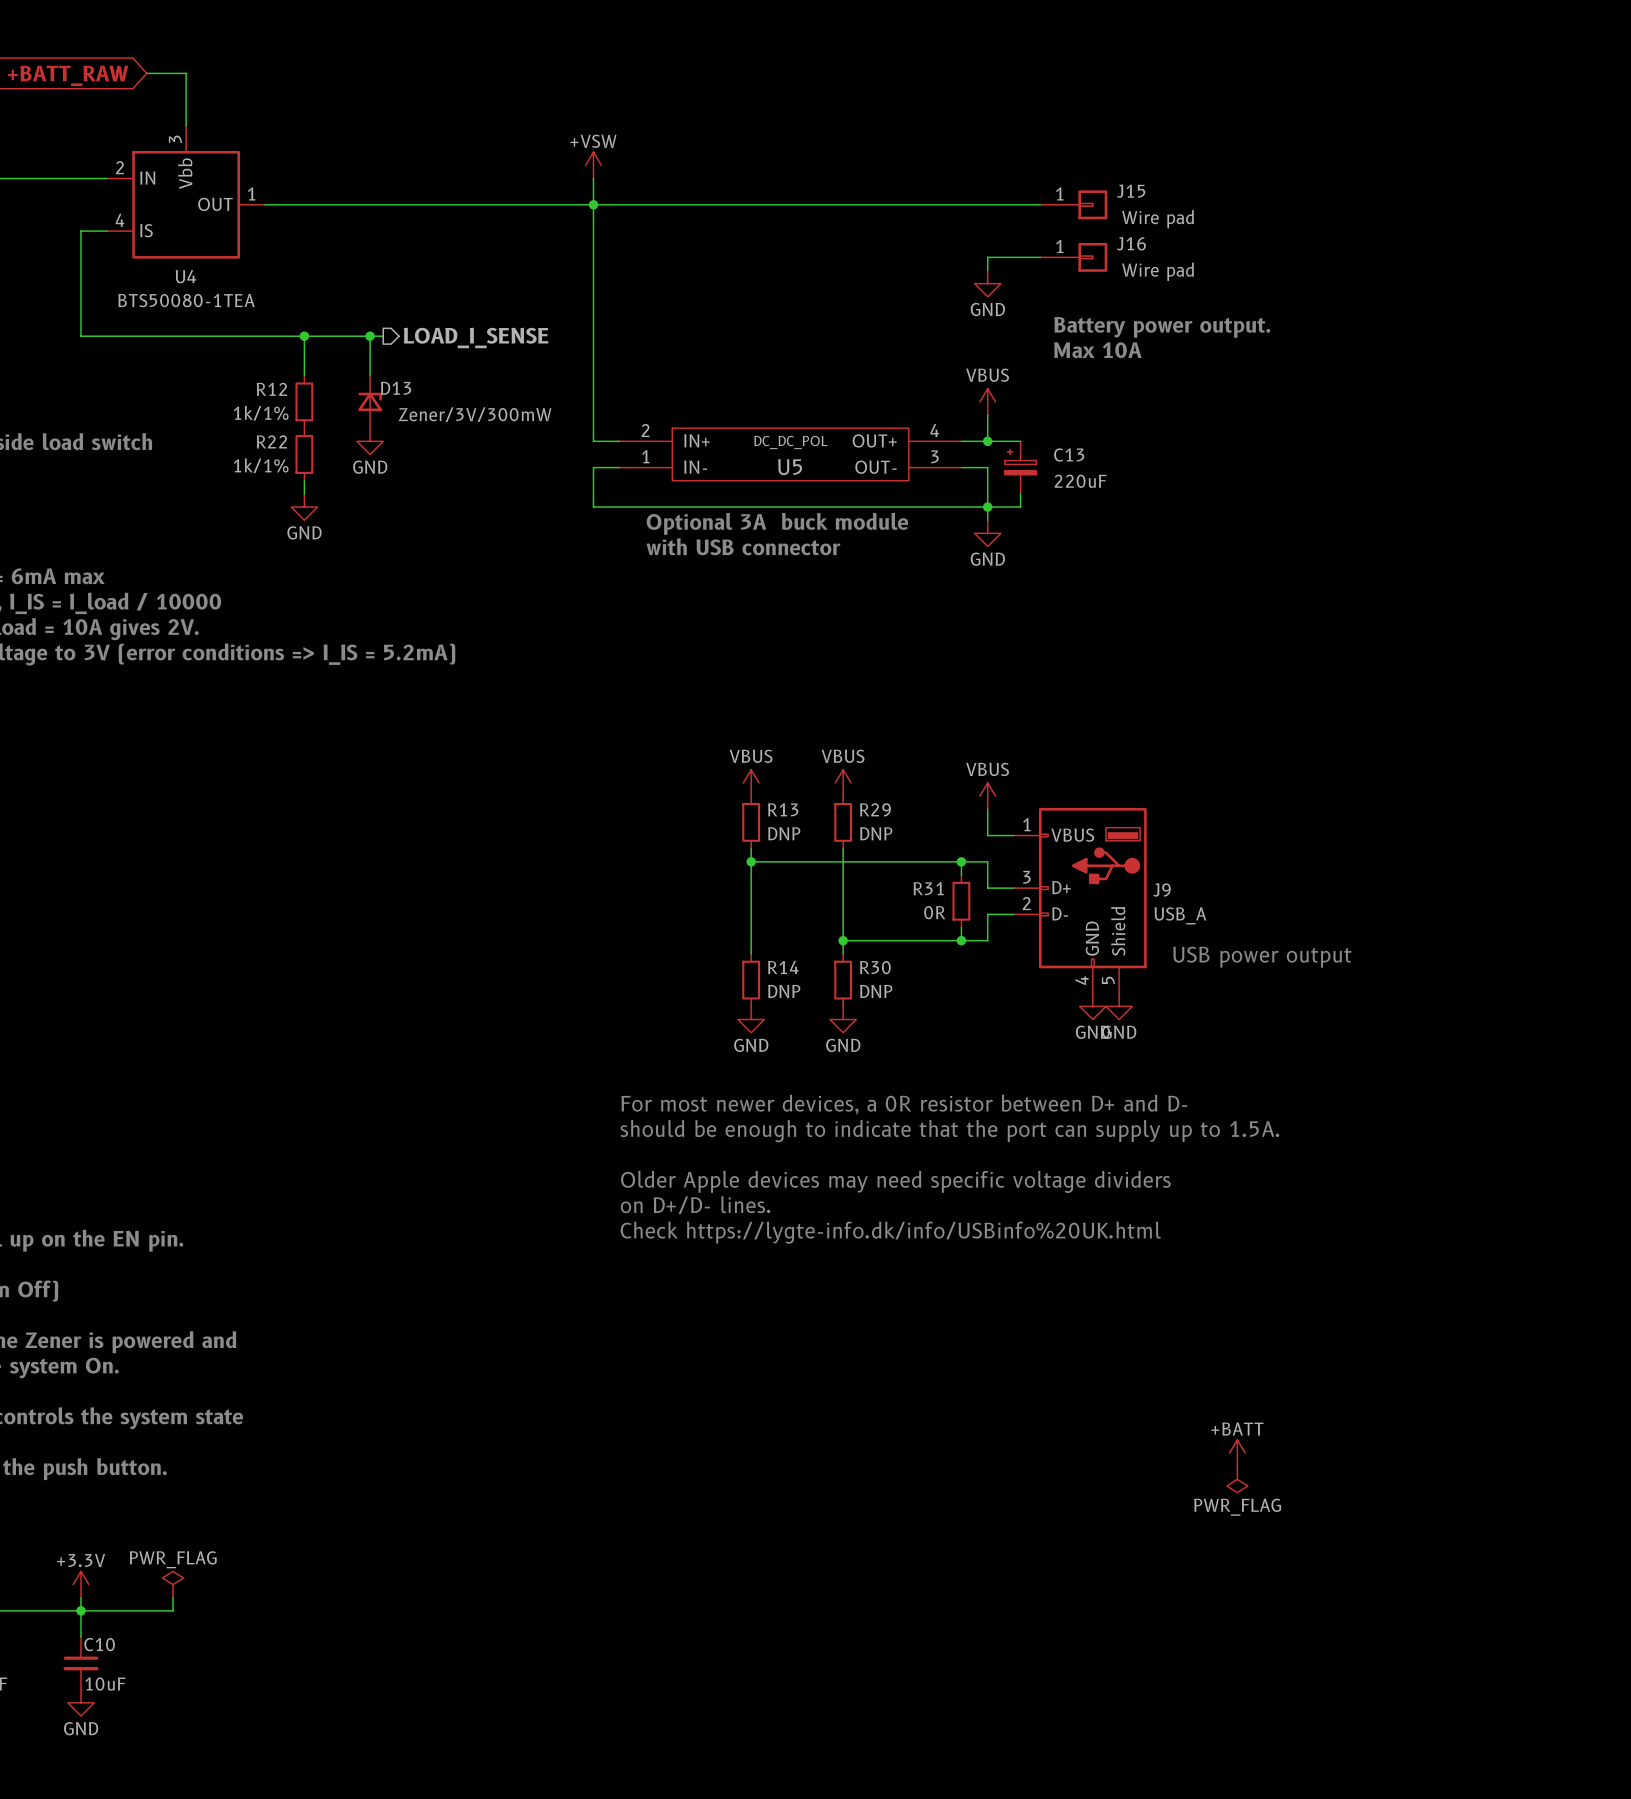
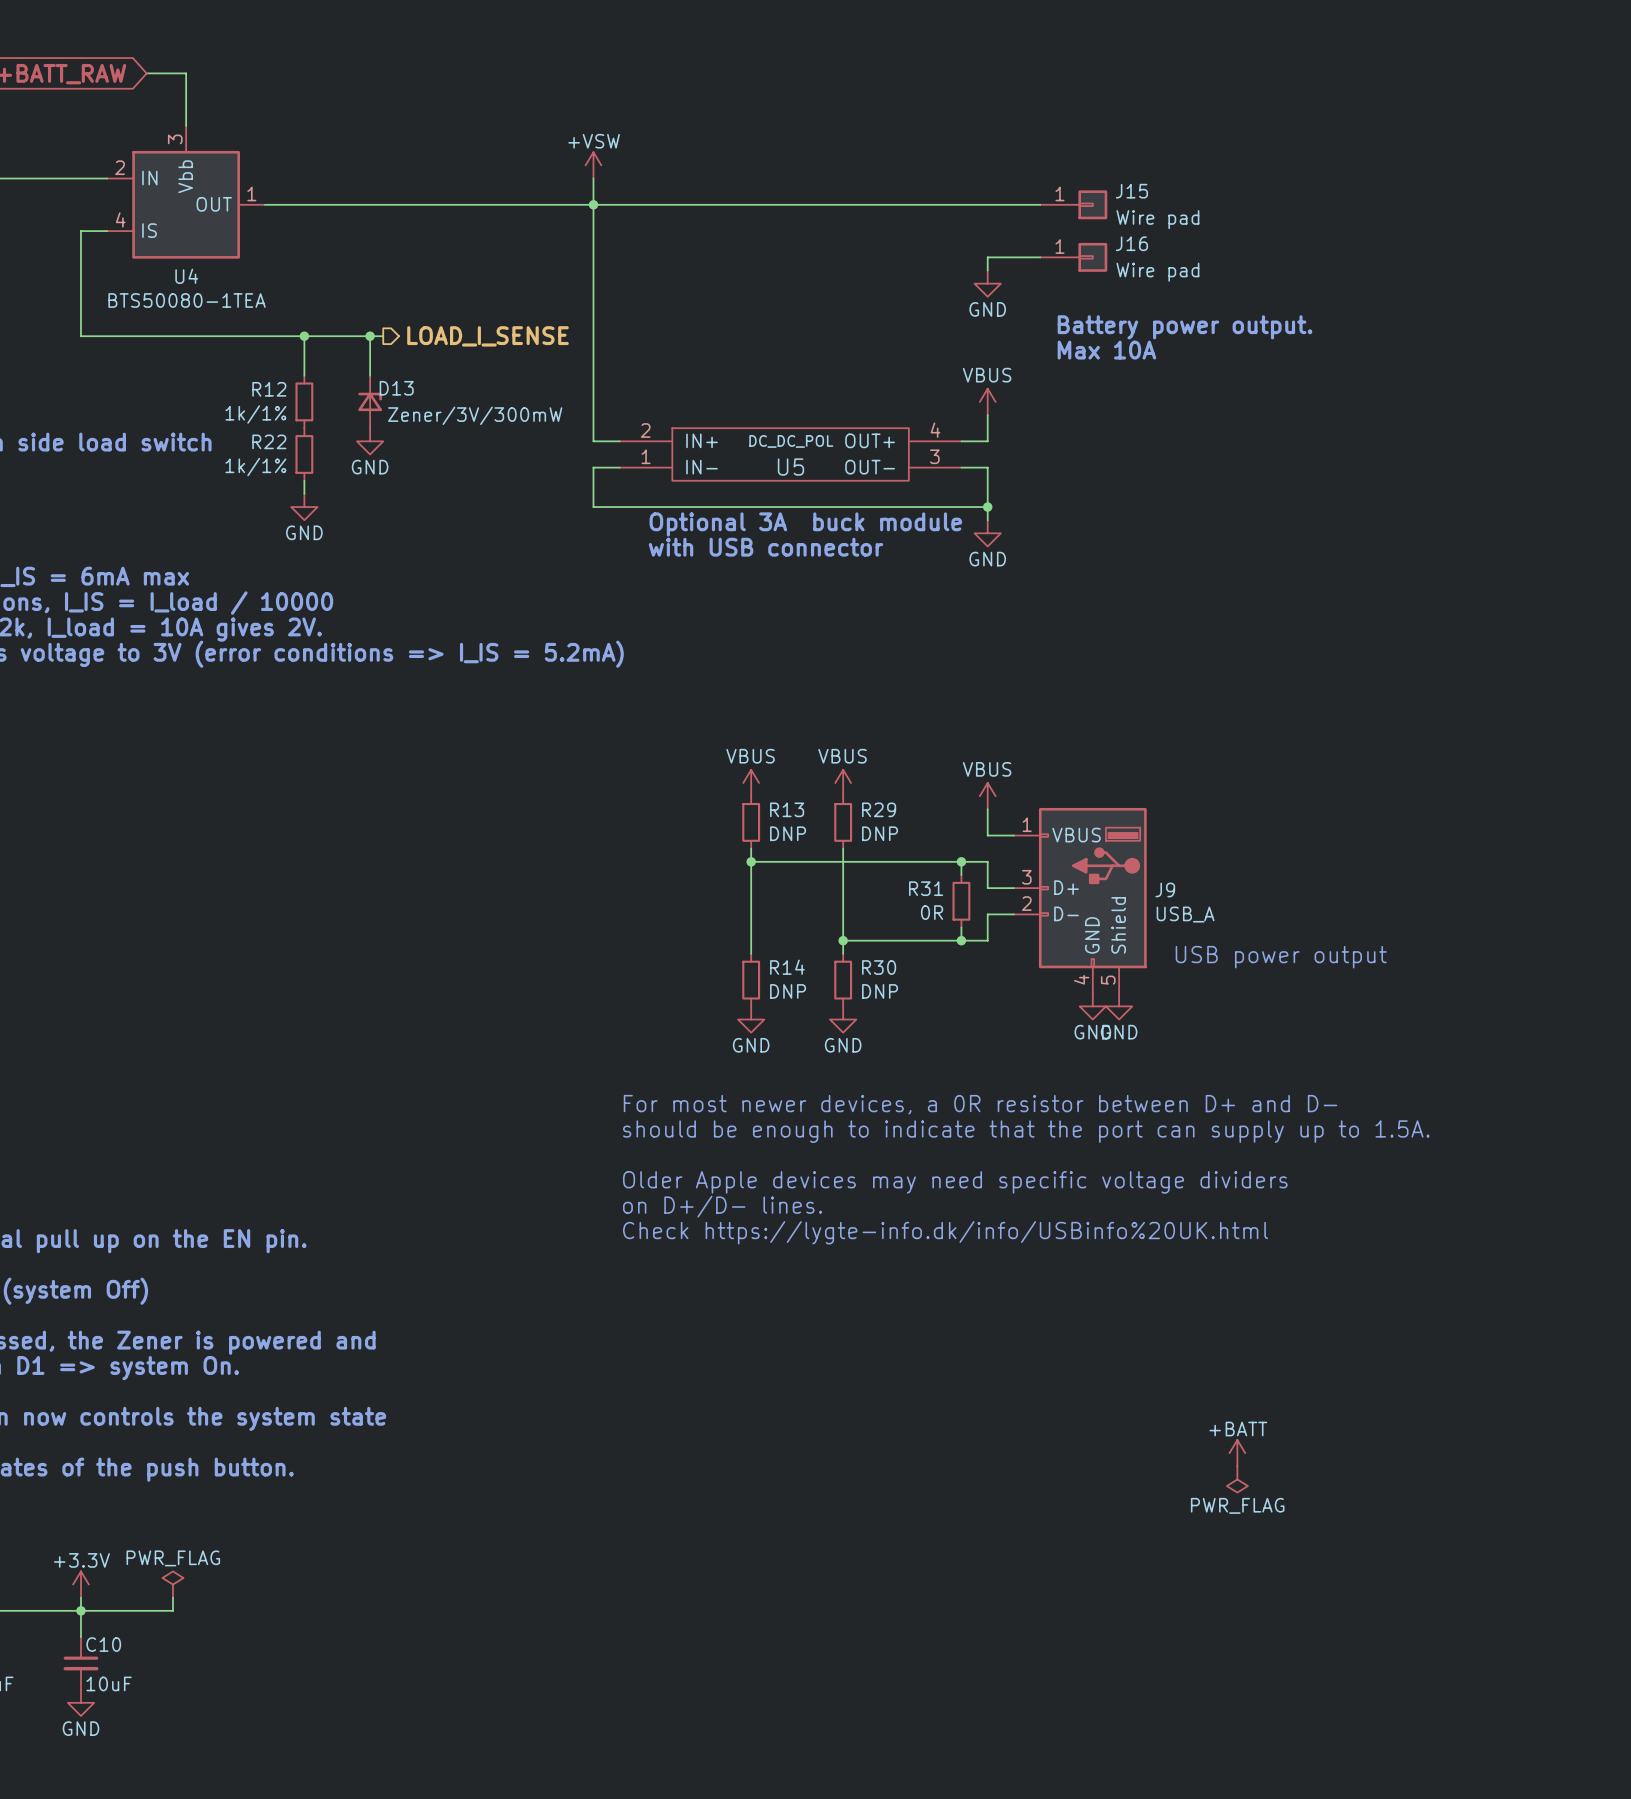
wire: (987, 441) (1020, 441) -> none
junction: (987, 441) -> none
C13: 220uF (1020, 467) -> none
wire: (1020, 493) (1020, 507) (987, 507) -> none

